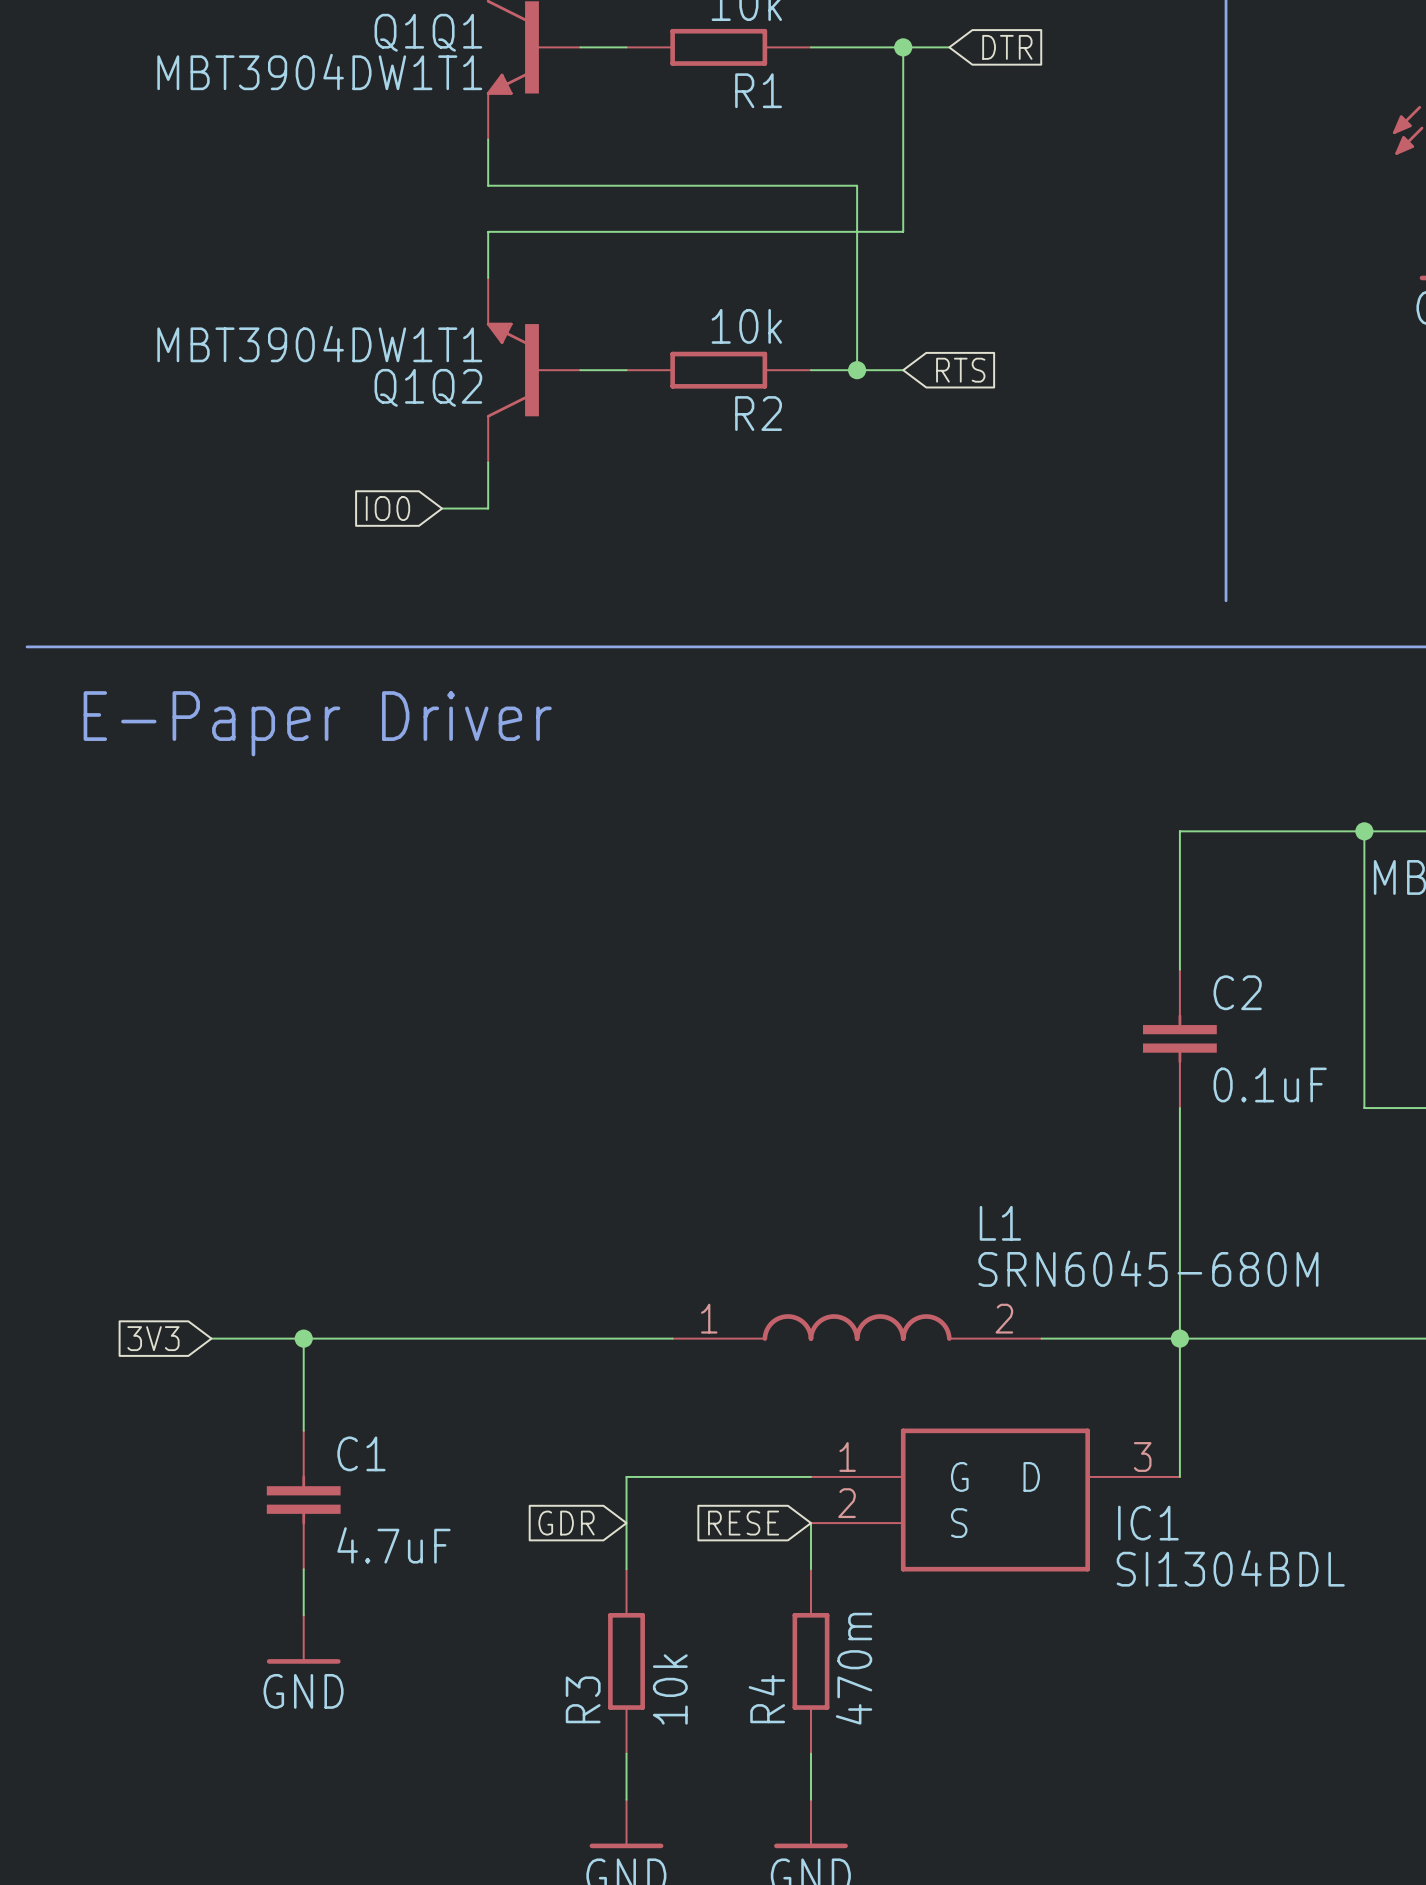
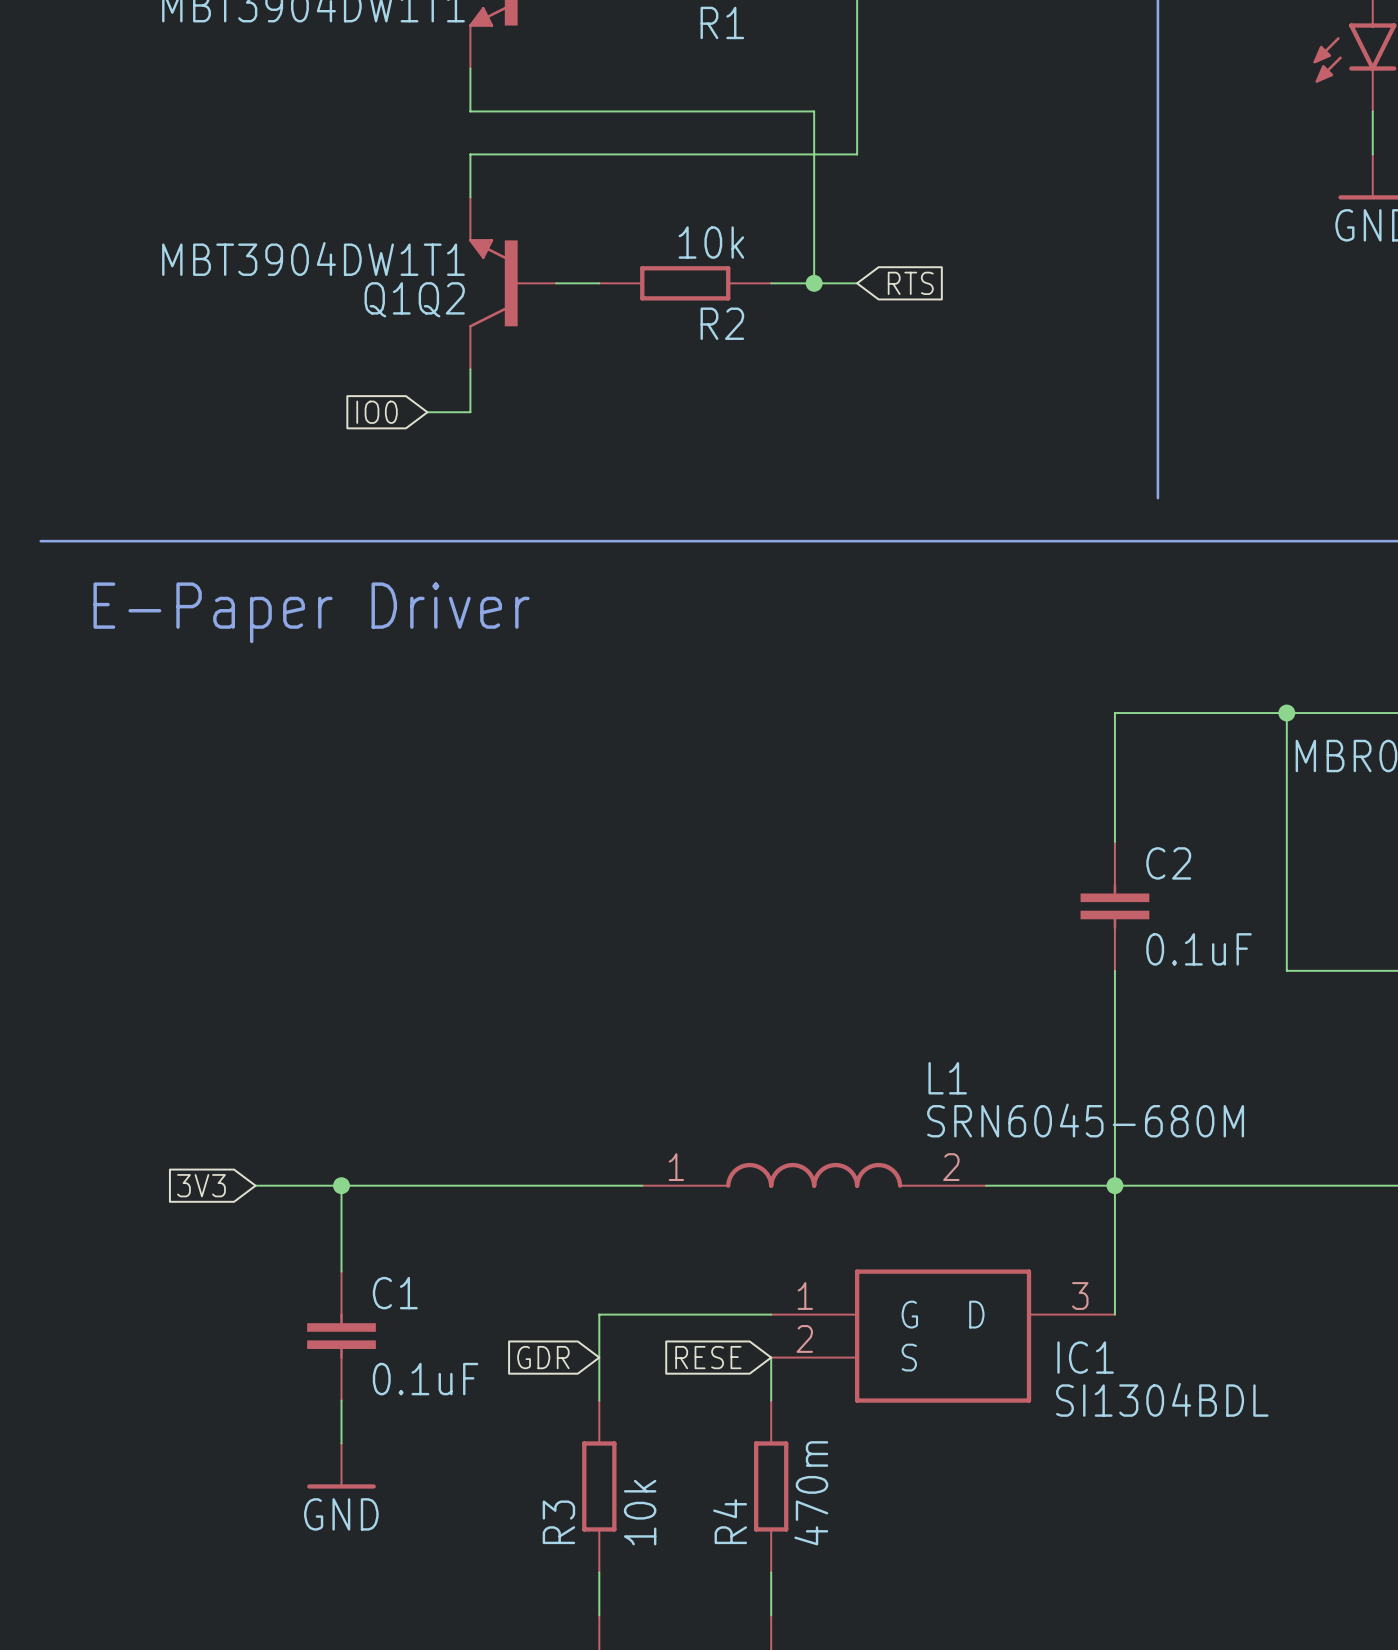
global label position: 3V3 (153, 1338) -> 3V3 (201, 1185)
wire: (211, 1338) (257, 1338) -> none
wire: (303, 1338) (303, 1430) -> (341, 1185) (341, 1271)
junction position: (303, 1338) -> (341, 1185)
C1 position: (303, 1500) -> (341, 1336)
C1 value: 4.7uF (393, 1545) -> 0.1uF (425, 1379)
wire: (303, 1569) (303, 1615) -> (341, 1400) (341, 1443)
power symbol position: GND (303, 1639) -> GND (341, 1466)

